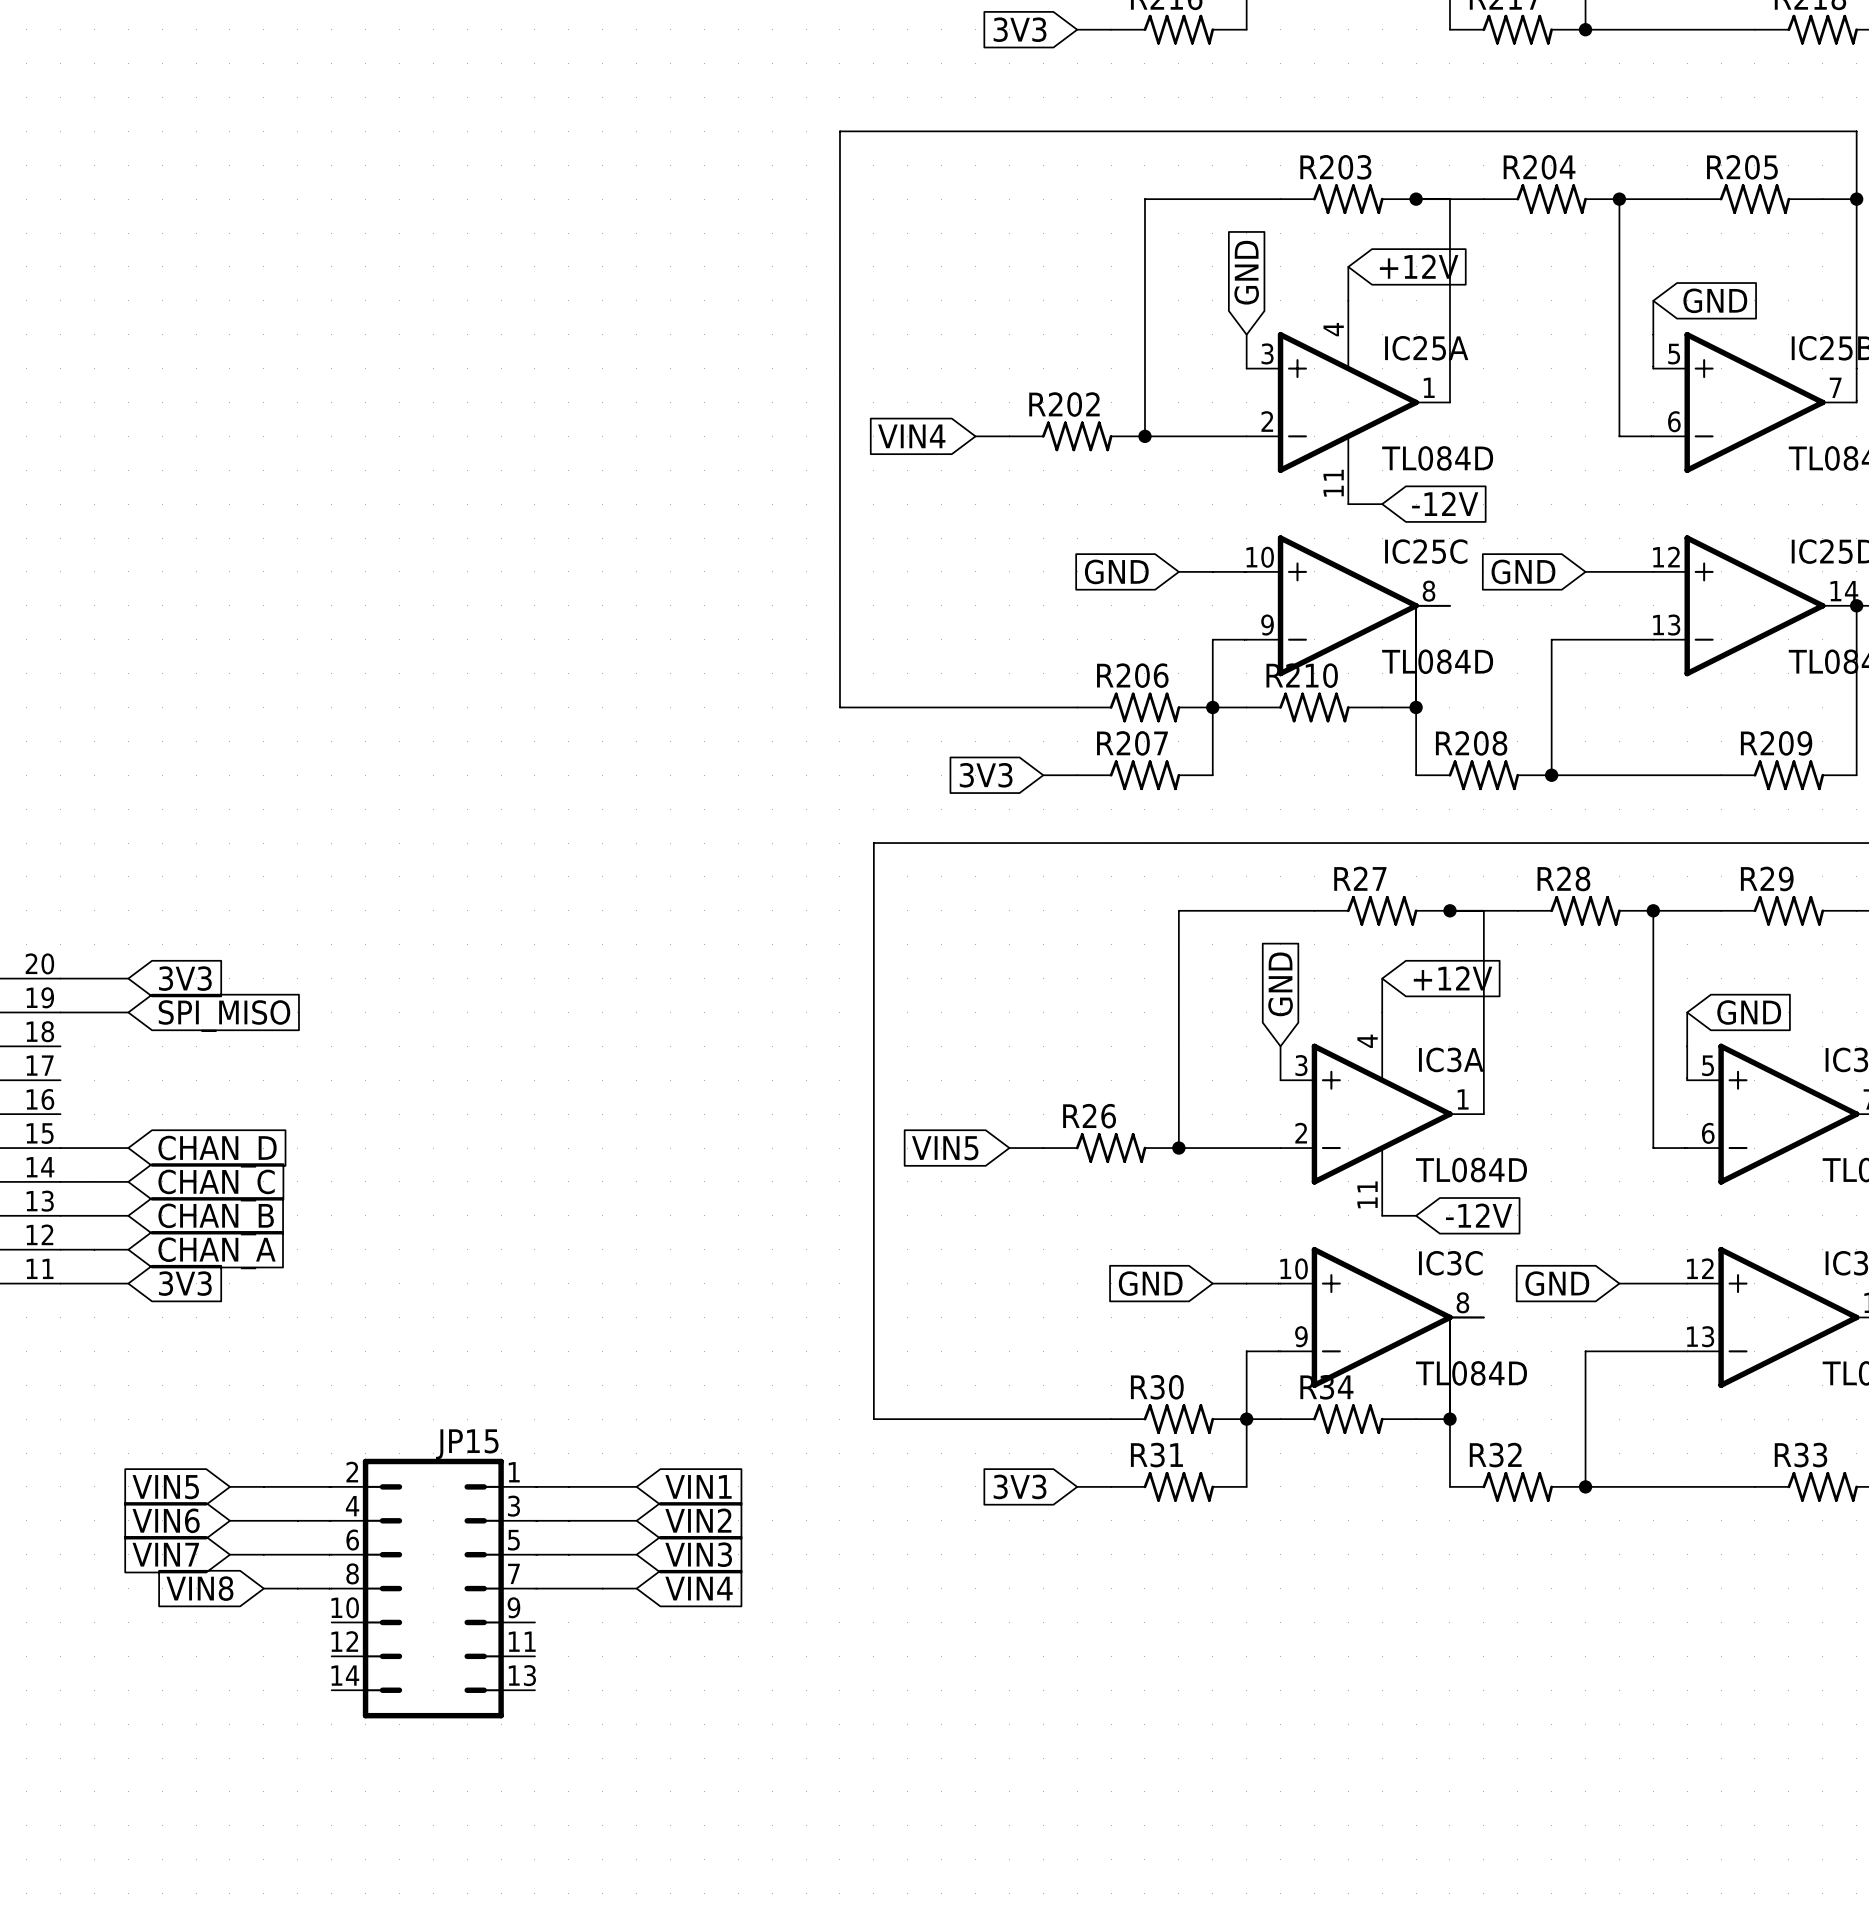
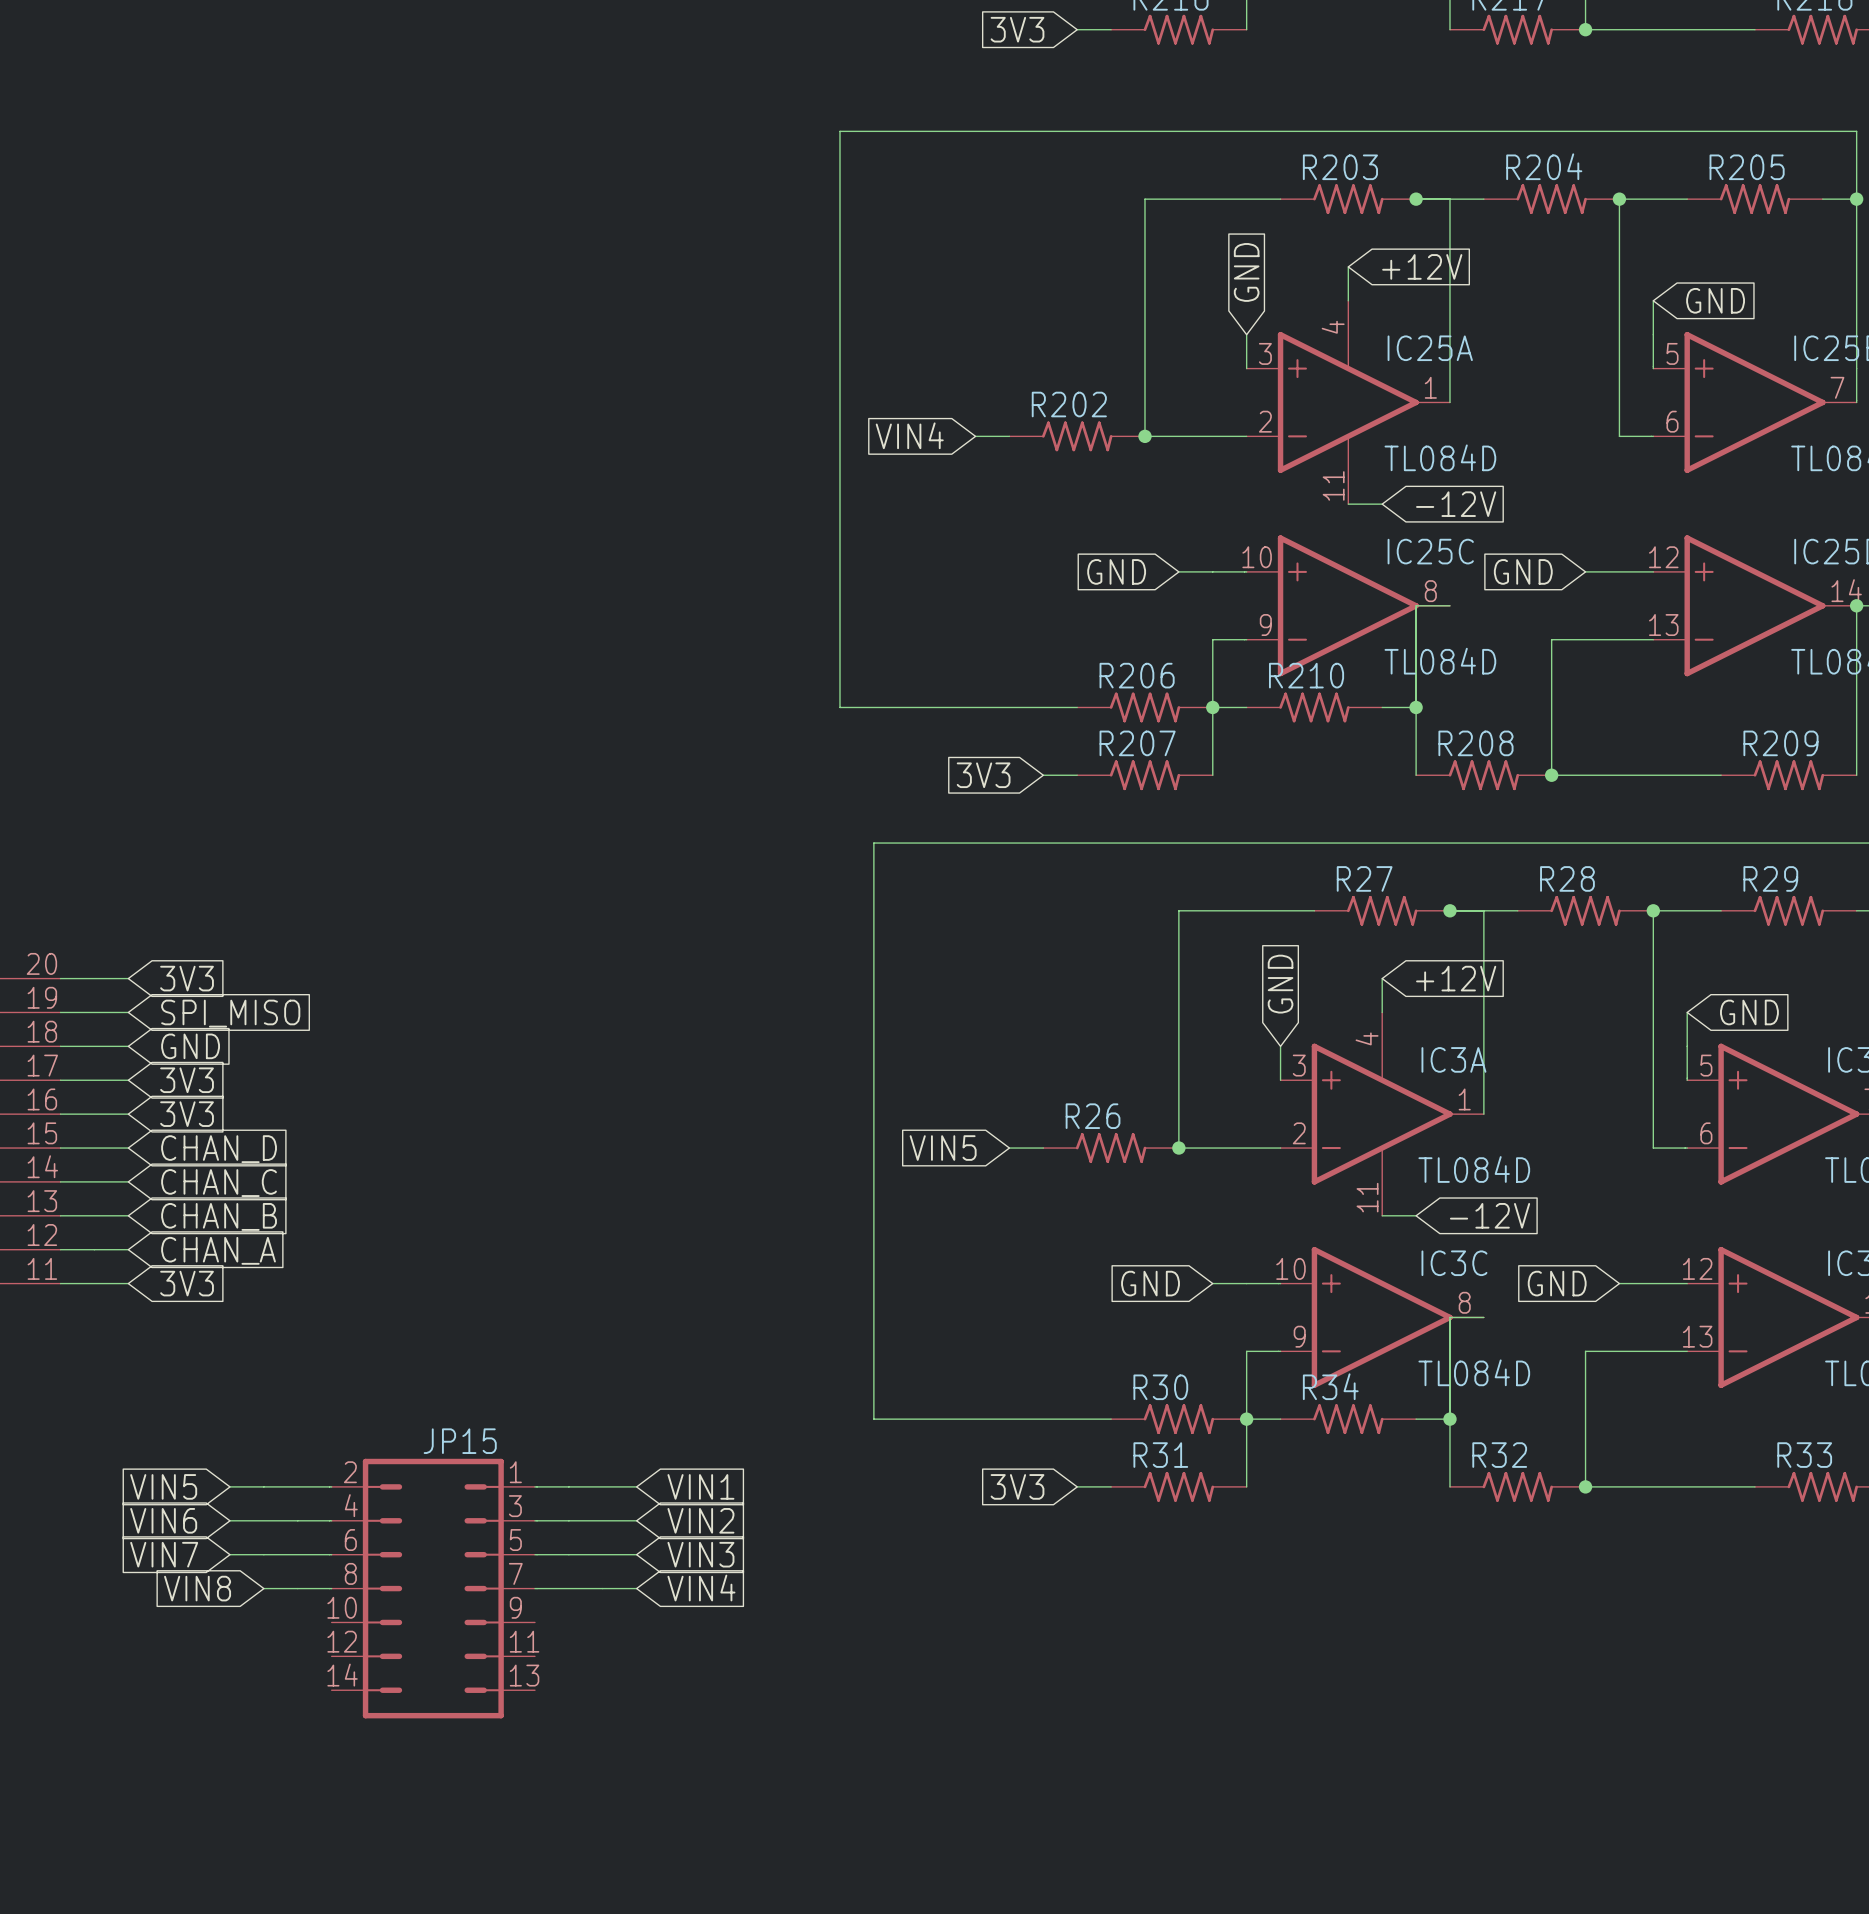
wire: none -> (60, 1046) (128, 1046)
global label: none -> GND (190, 1046)
wire: none -> (60, 1080) (128, 1080)
global label: none -> 3V3 (187, 1080)
wire: none -> (60, 1114) (128, 1114)
global label: none -> 3V3 (187, 1114)

